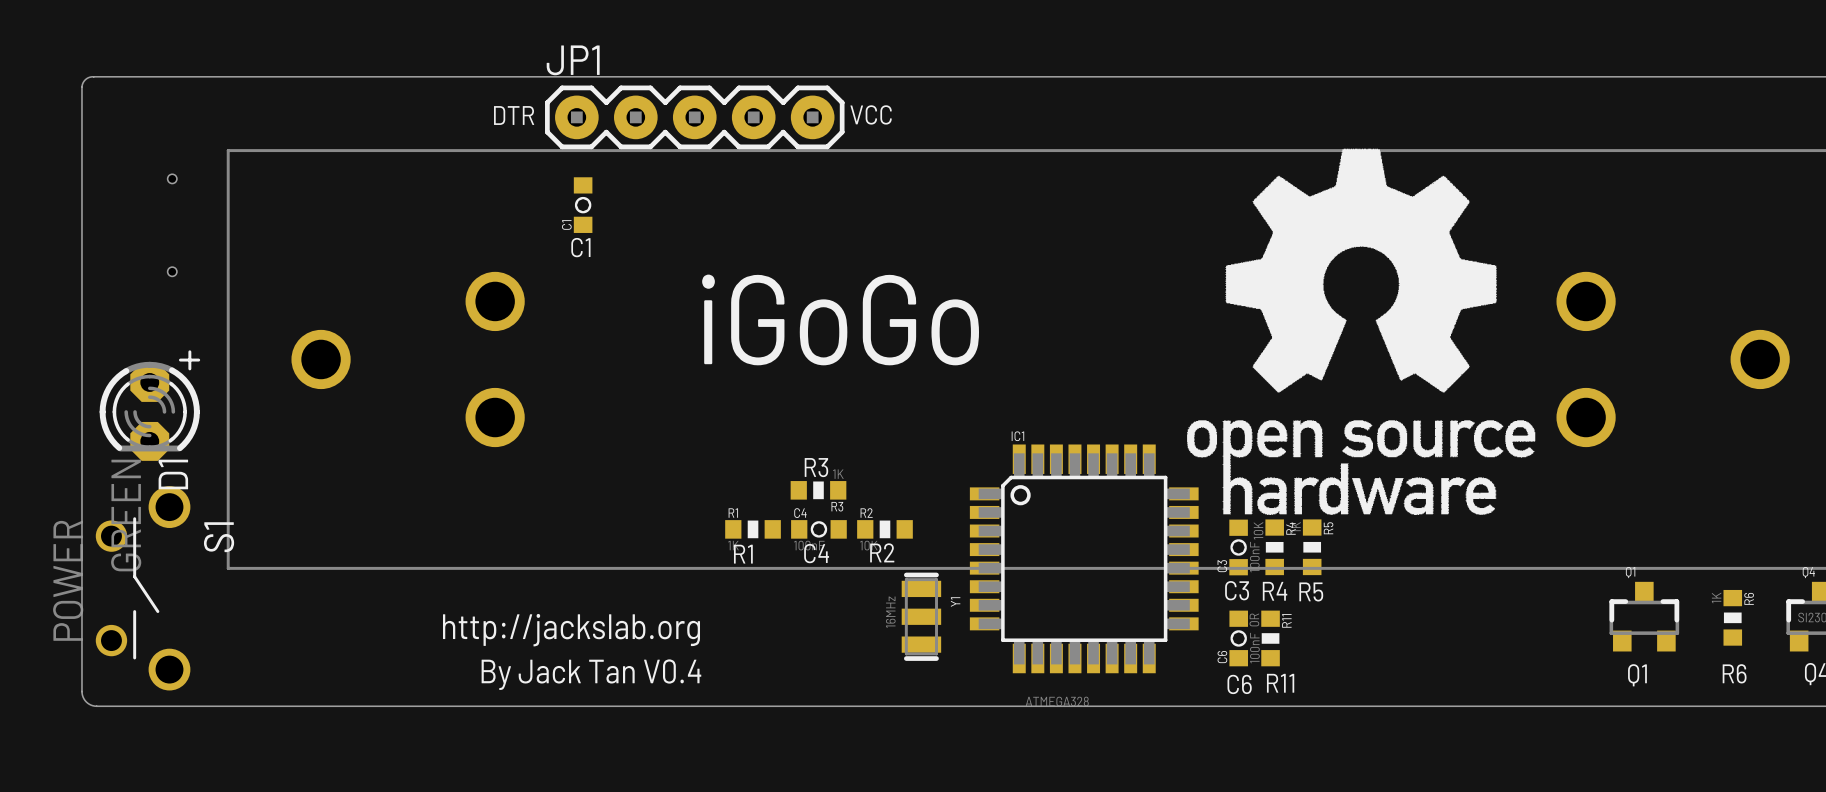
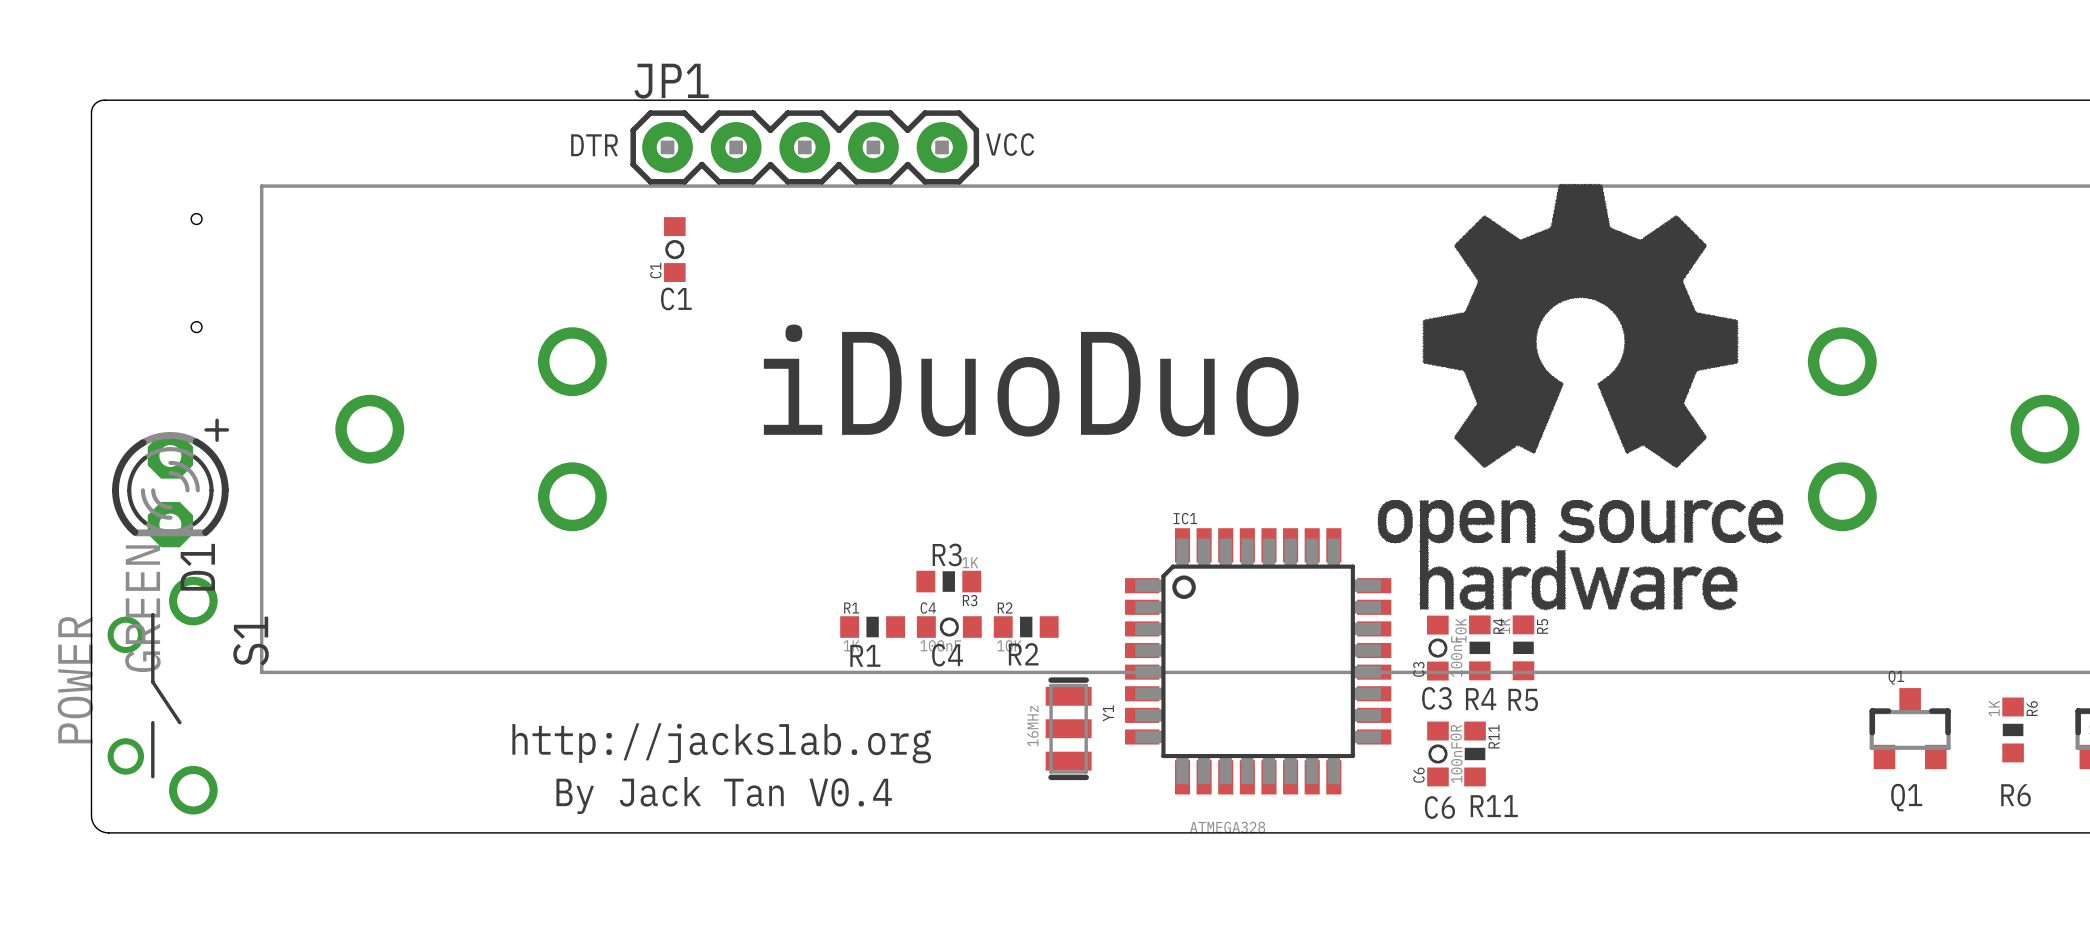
text: iGoGo (840, 319) -> none
text: none -> iDuoDuo (1031, 380)

